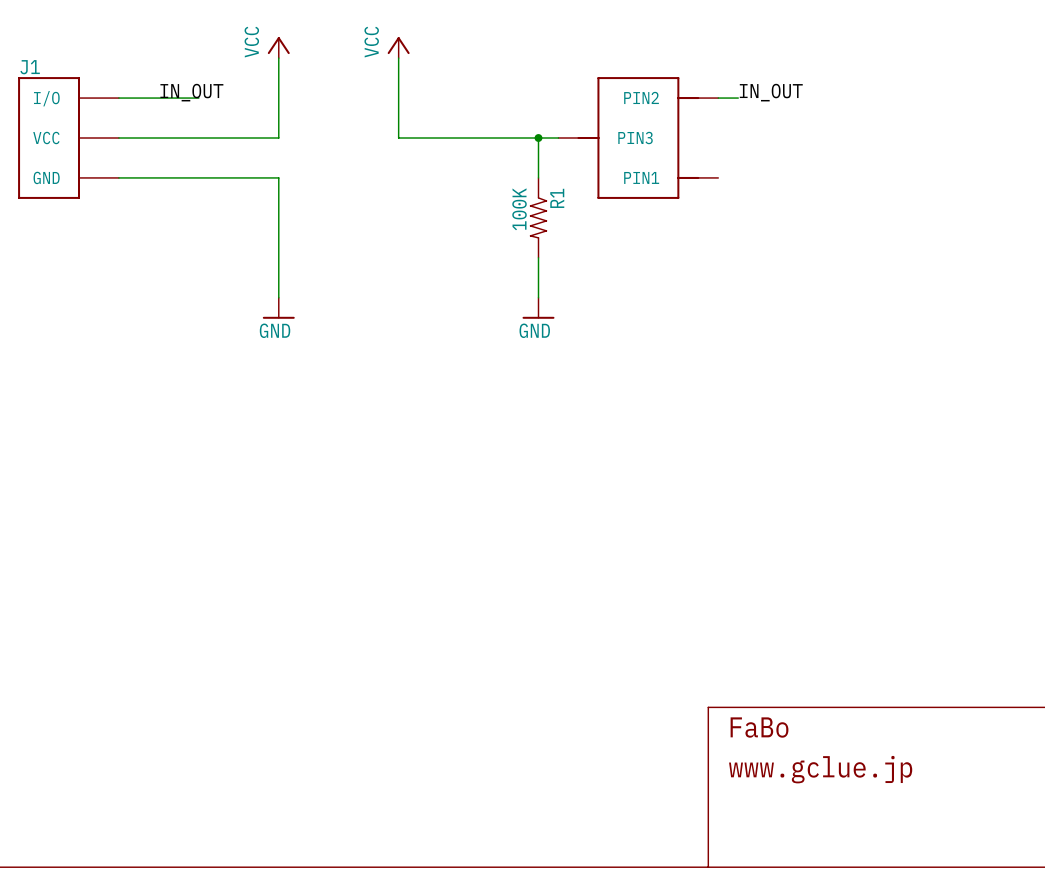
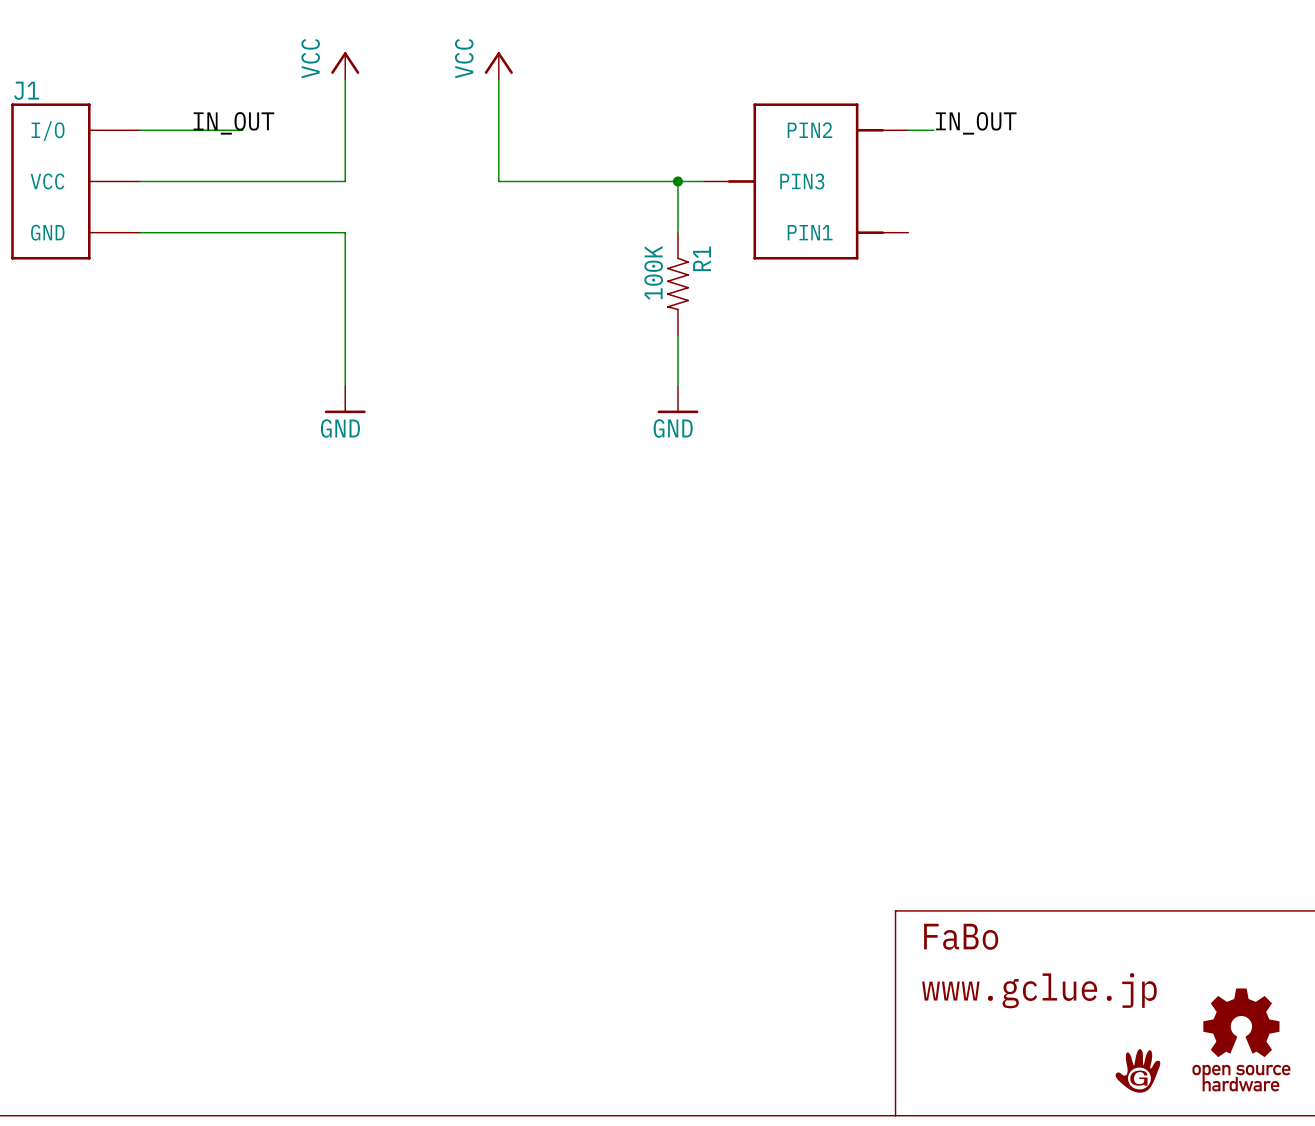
part: none -> (1241, 1039)
part: none -> (1137, 1070)

